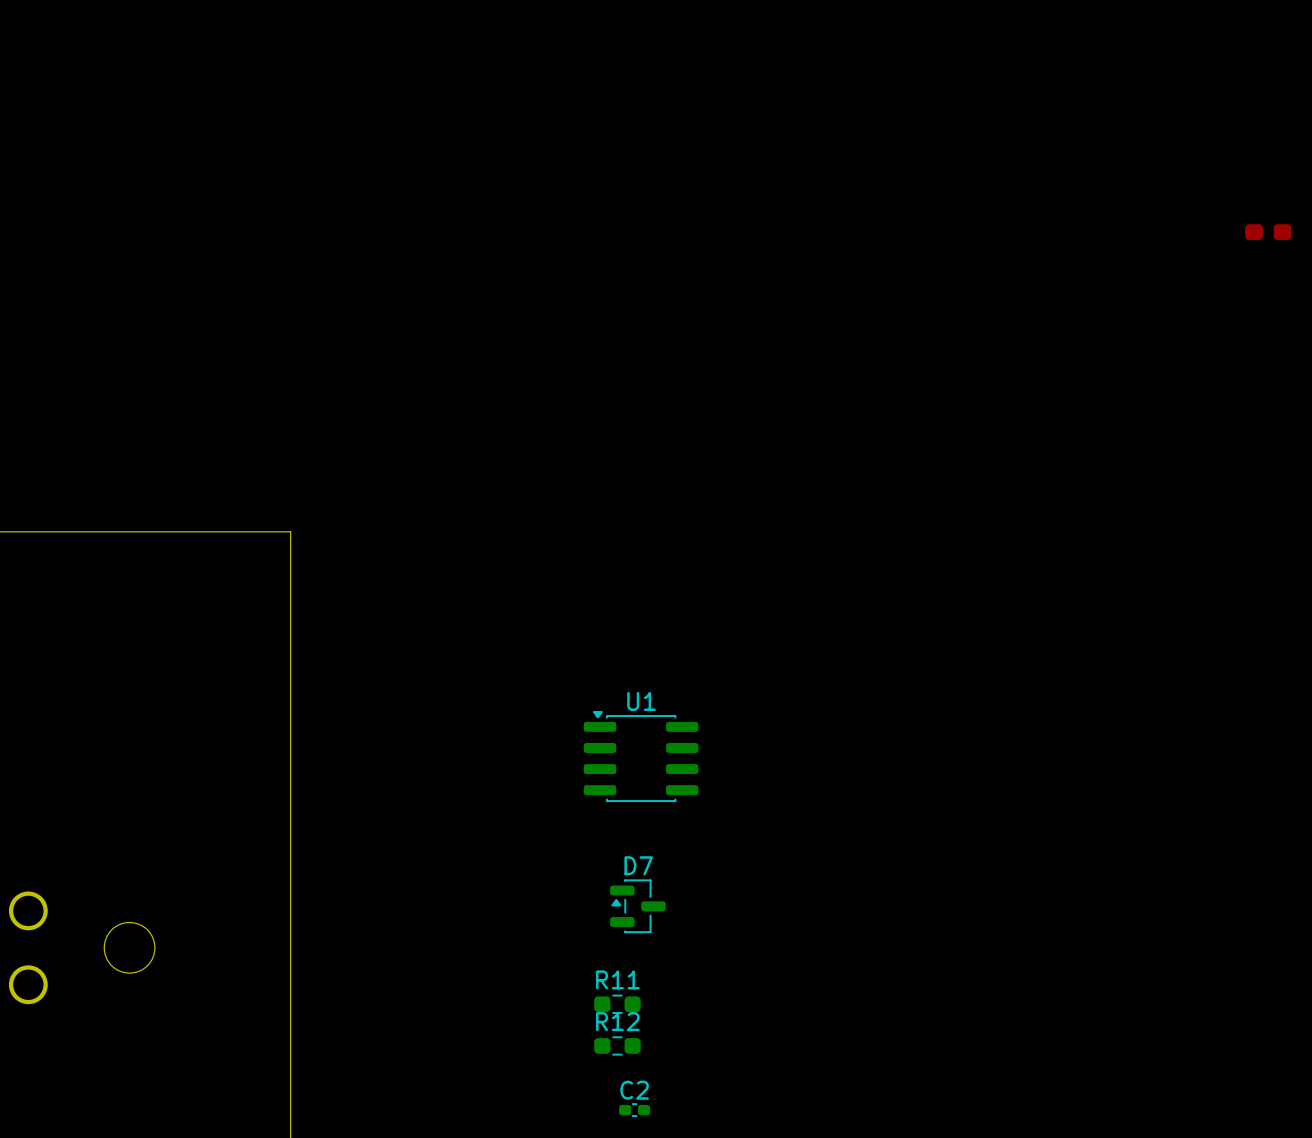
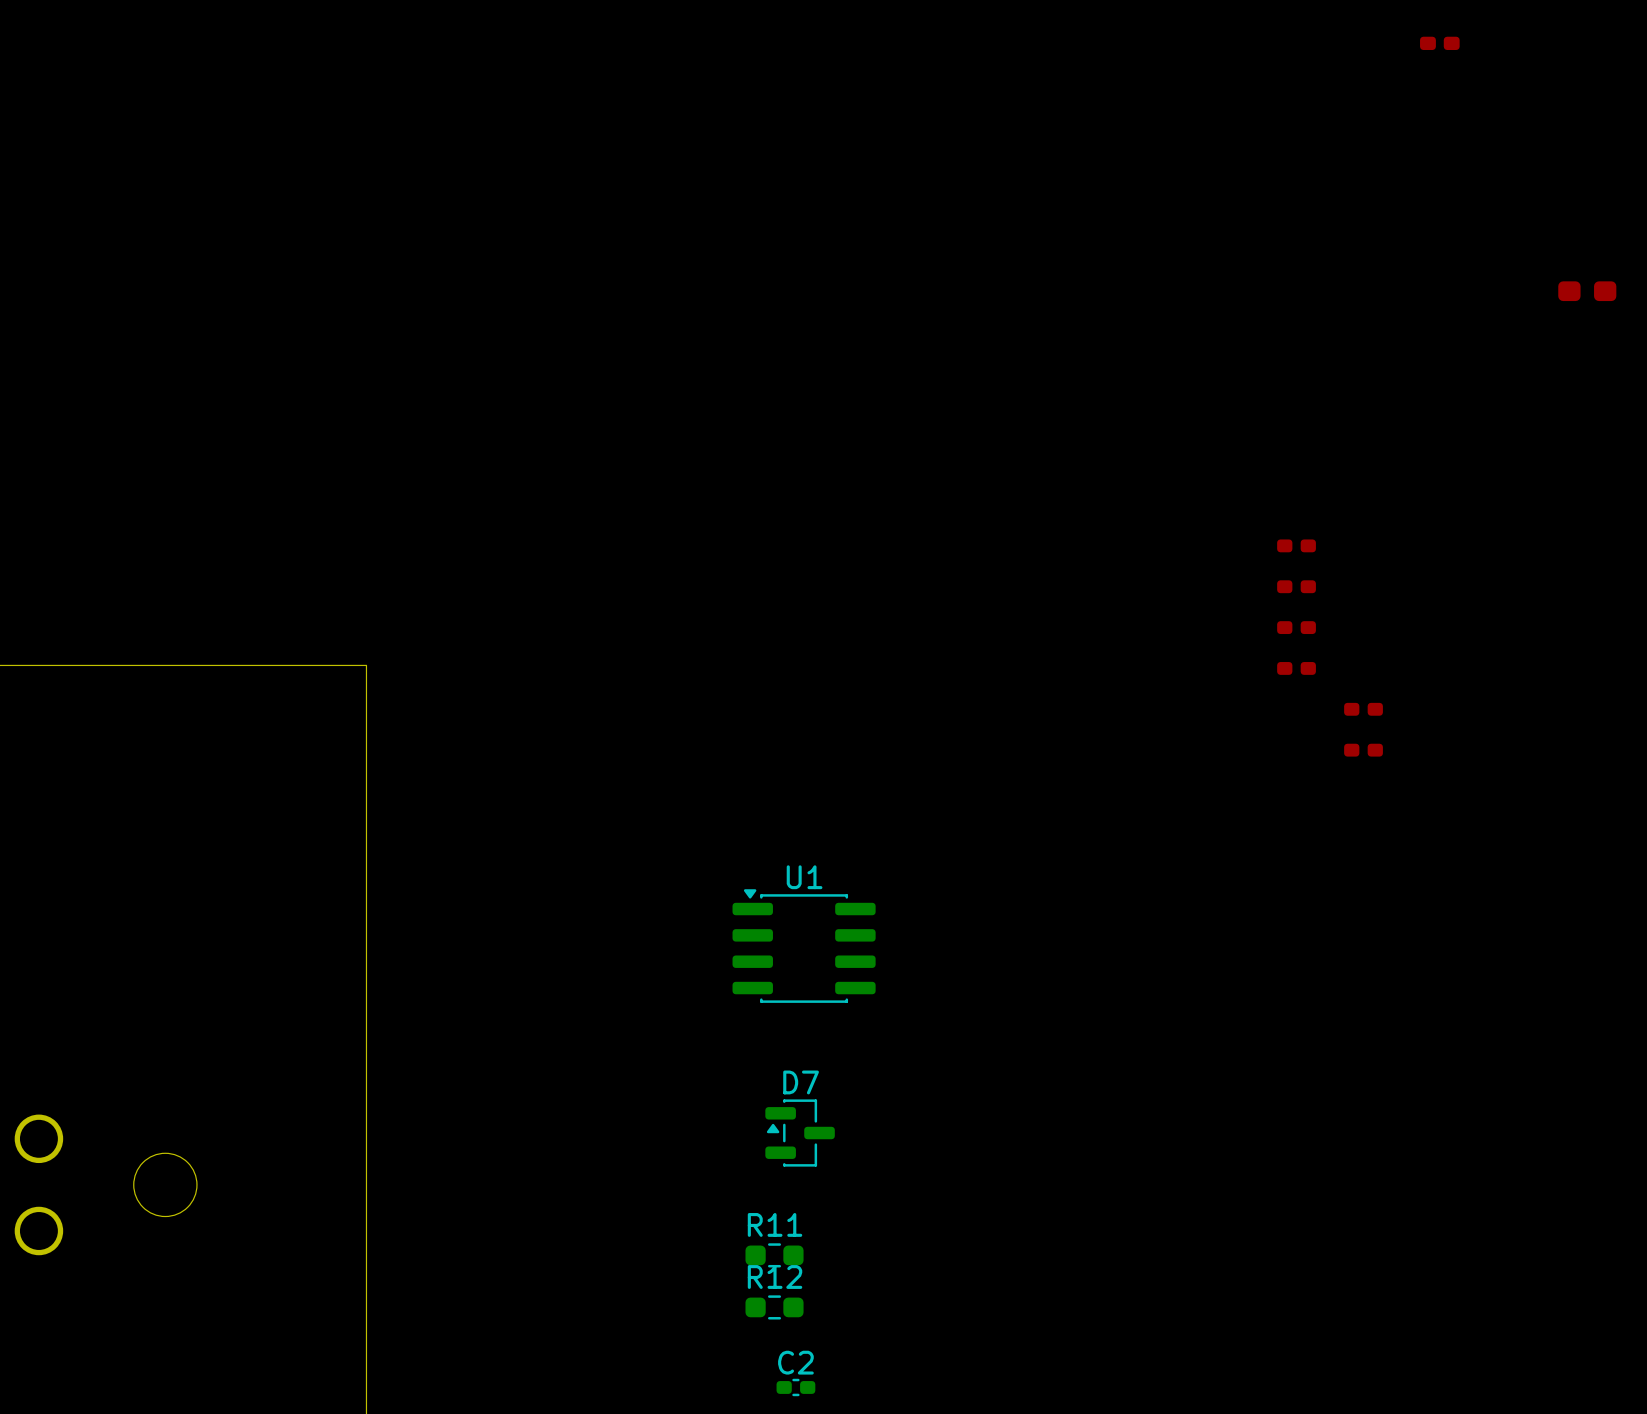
part: none -> (1439, 43)
part: none -> (1296, 545)
part: none -> (1296, 586)
part: none -> (1296, 627)
part: none -> (1296, 668)
part: none -> (1363, 709)
part: none -> (1363, 750)

